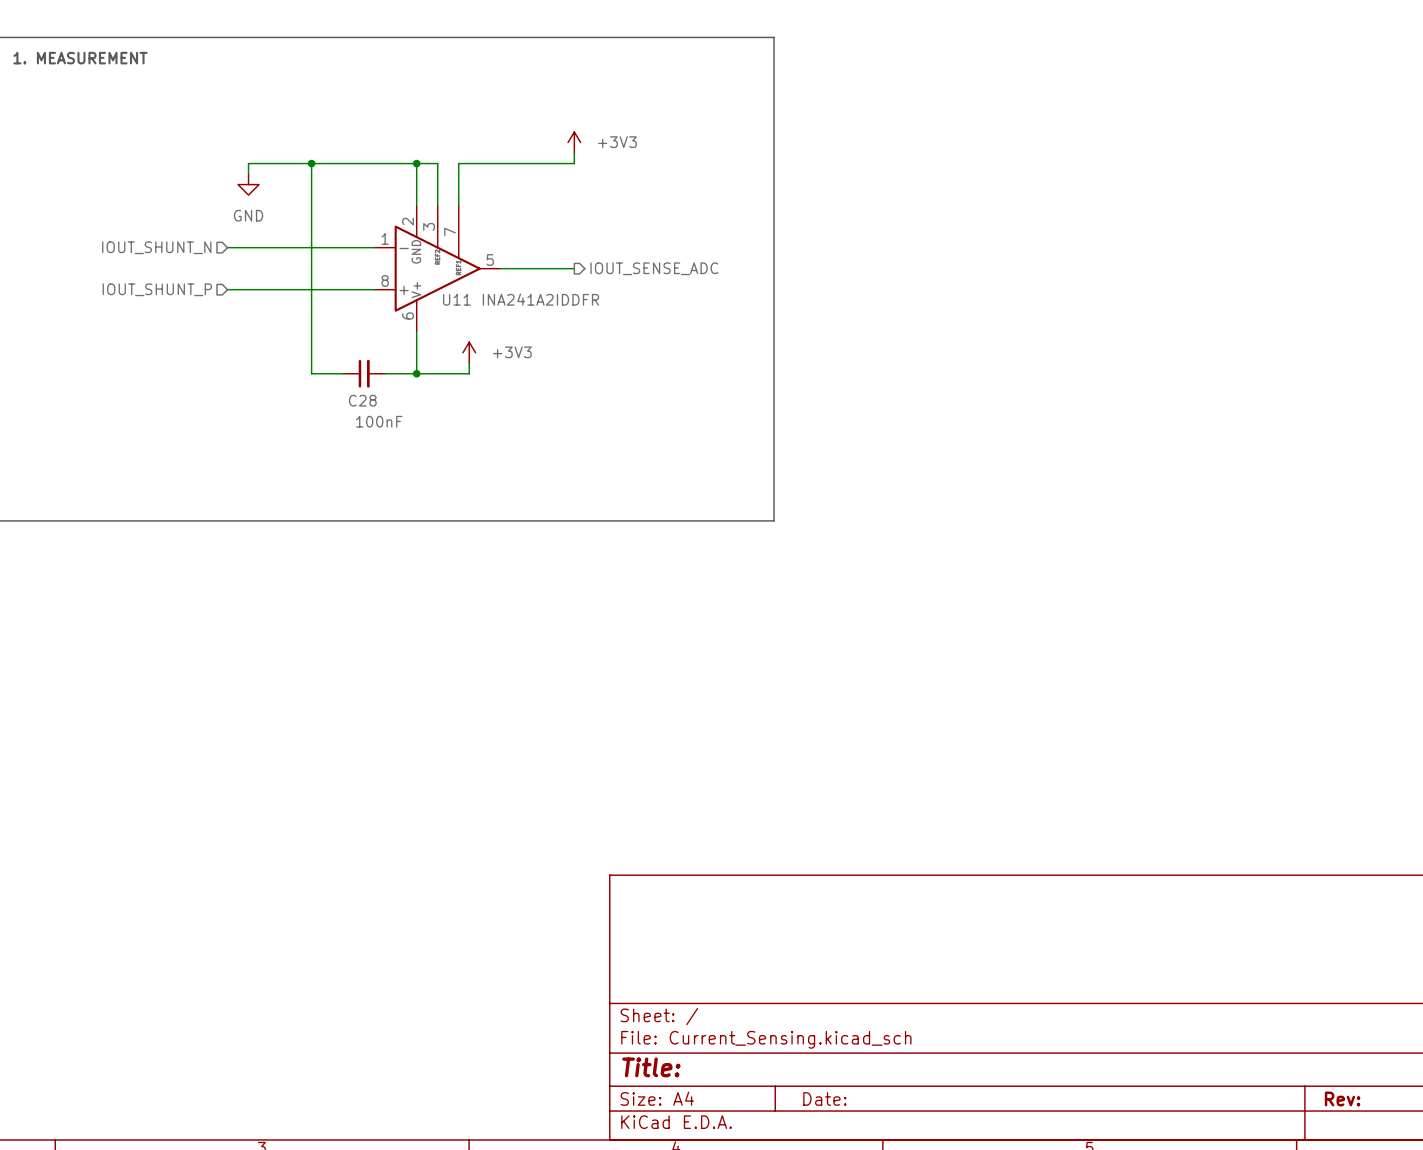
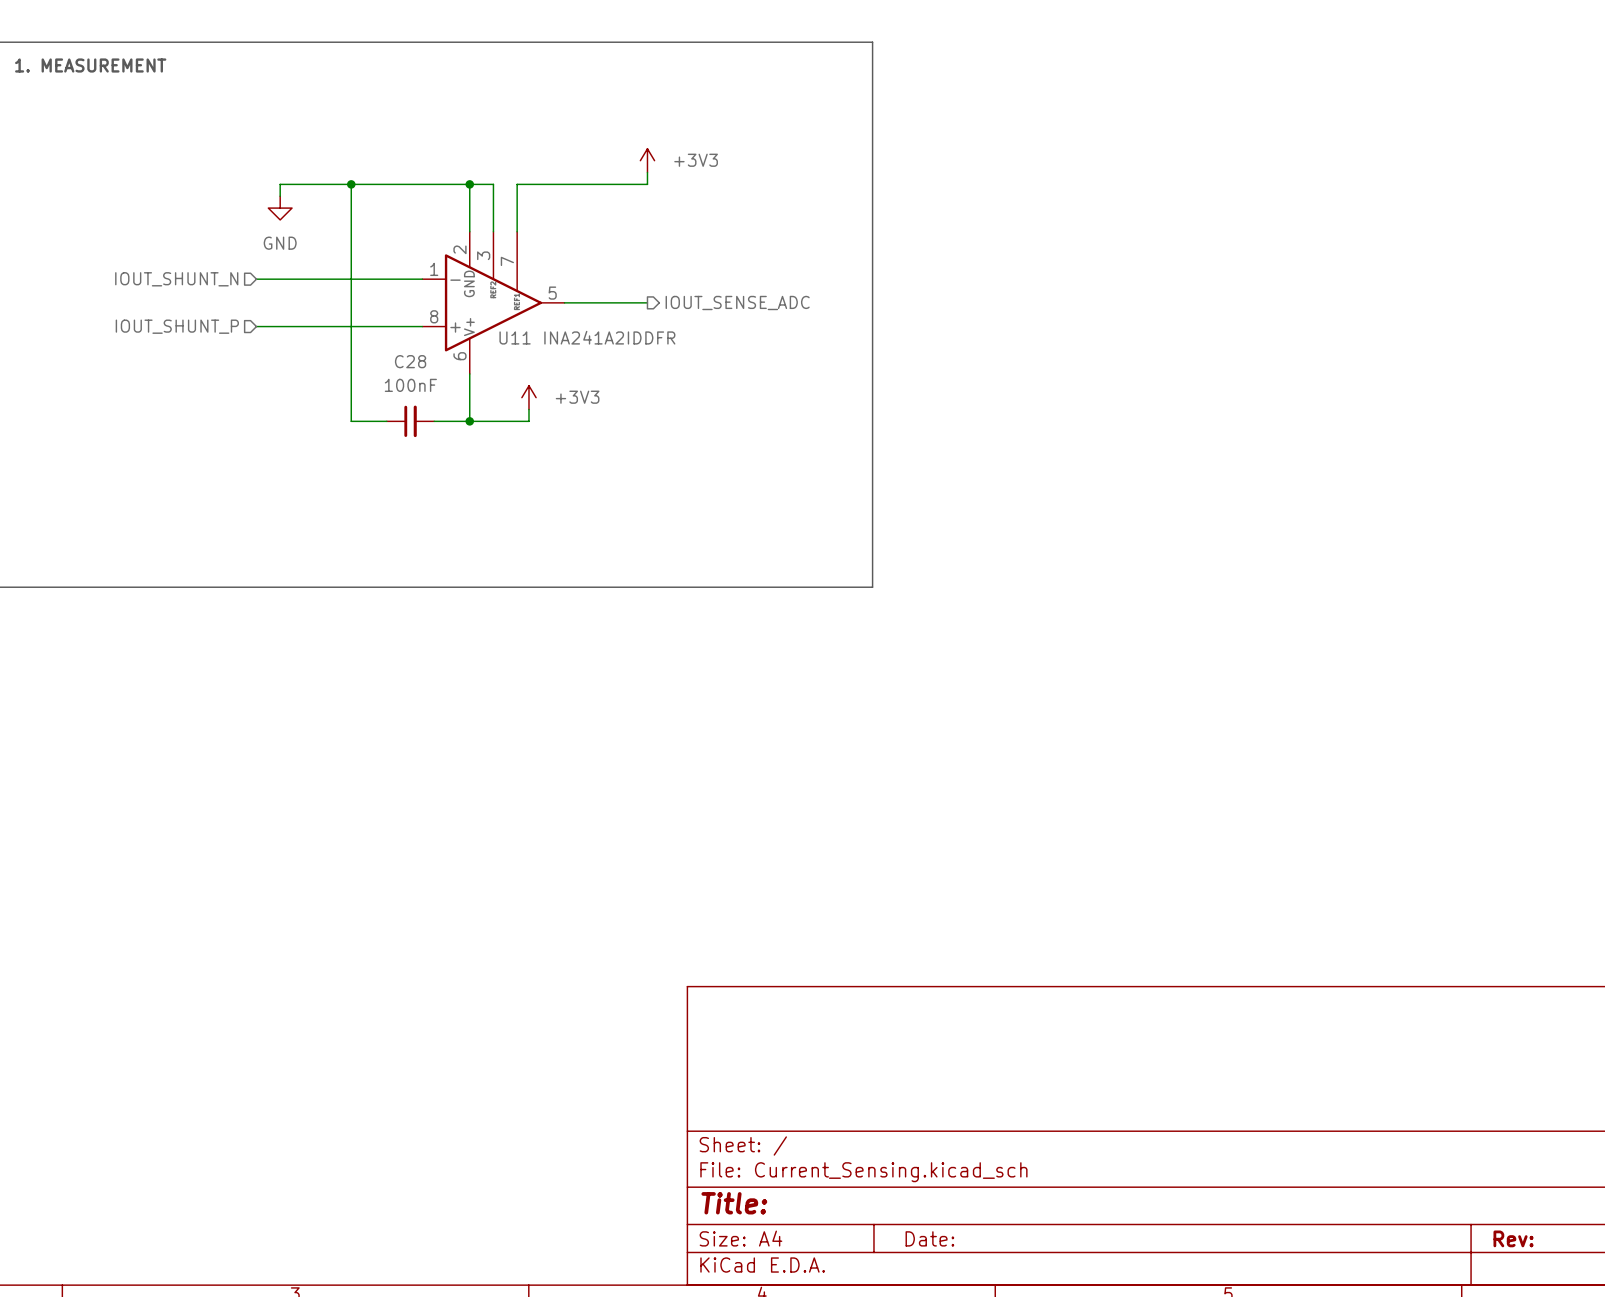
C28 name position: C28 (362, 400) -> C28 (410, 361)
C28 value position: 100nF (379, 421) -> 100nF (410, 385)

